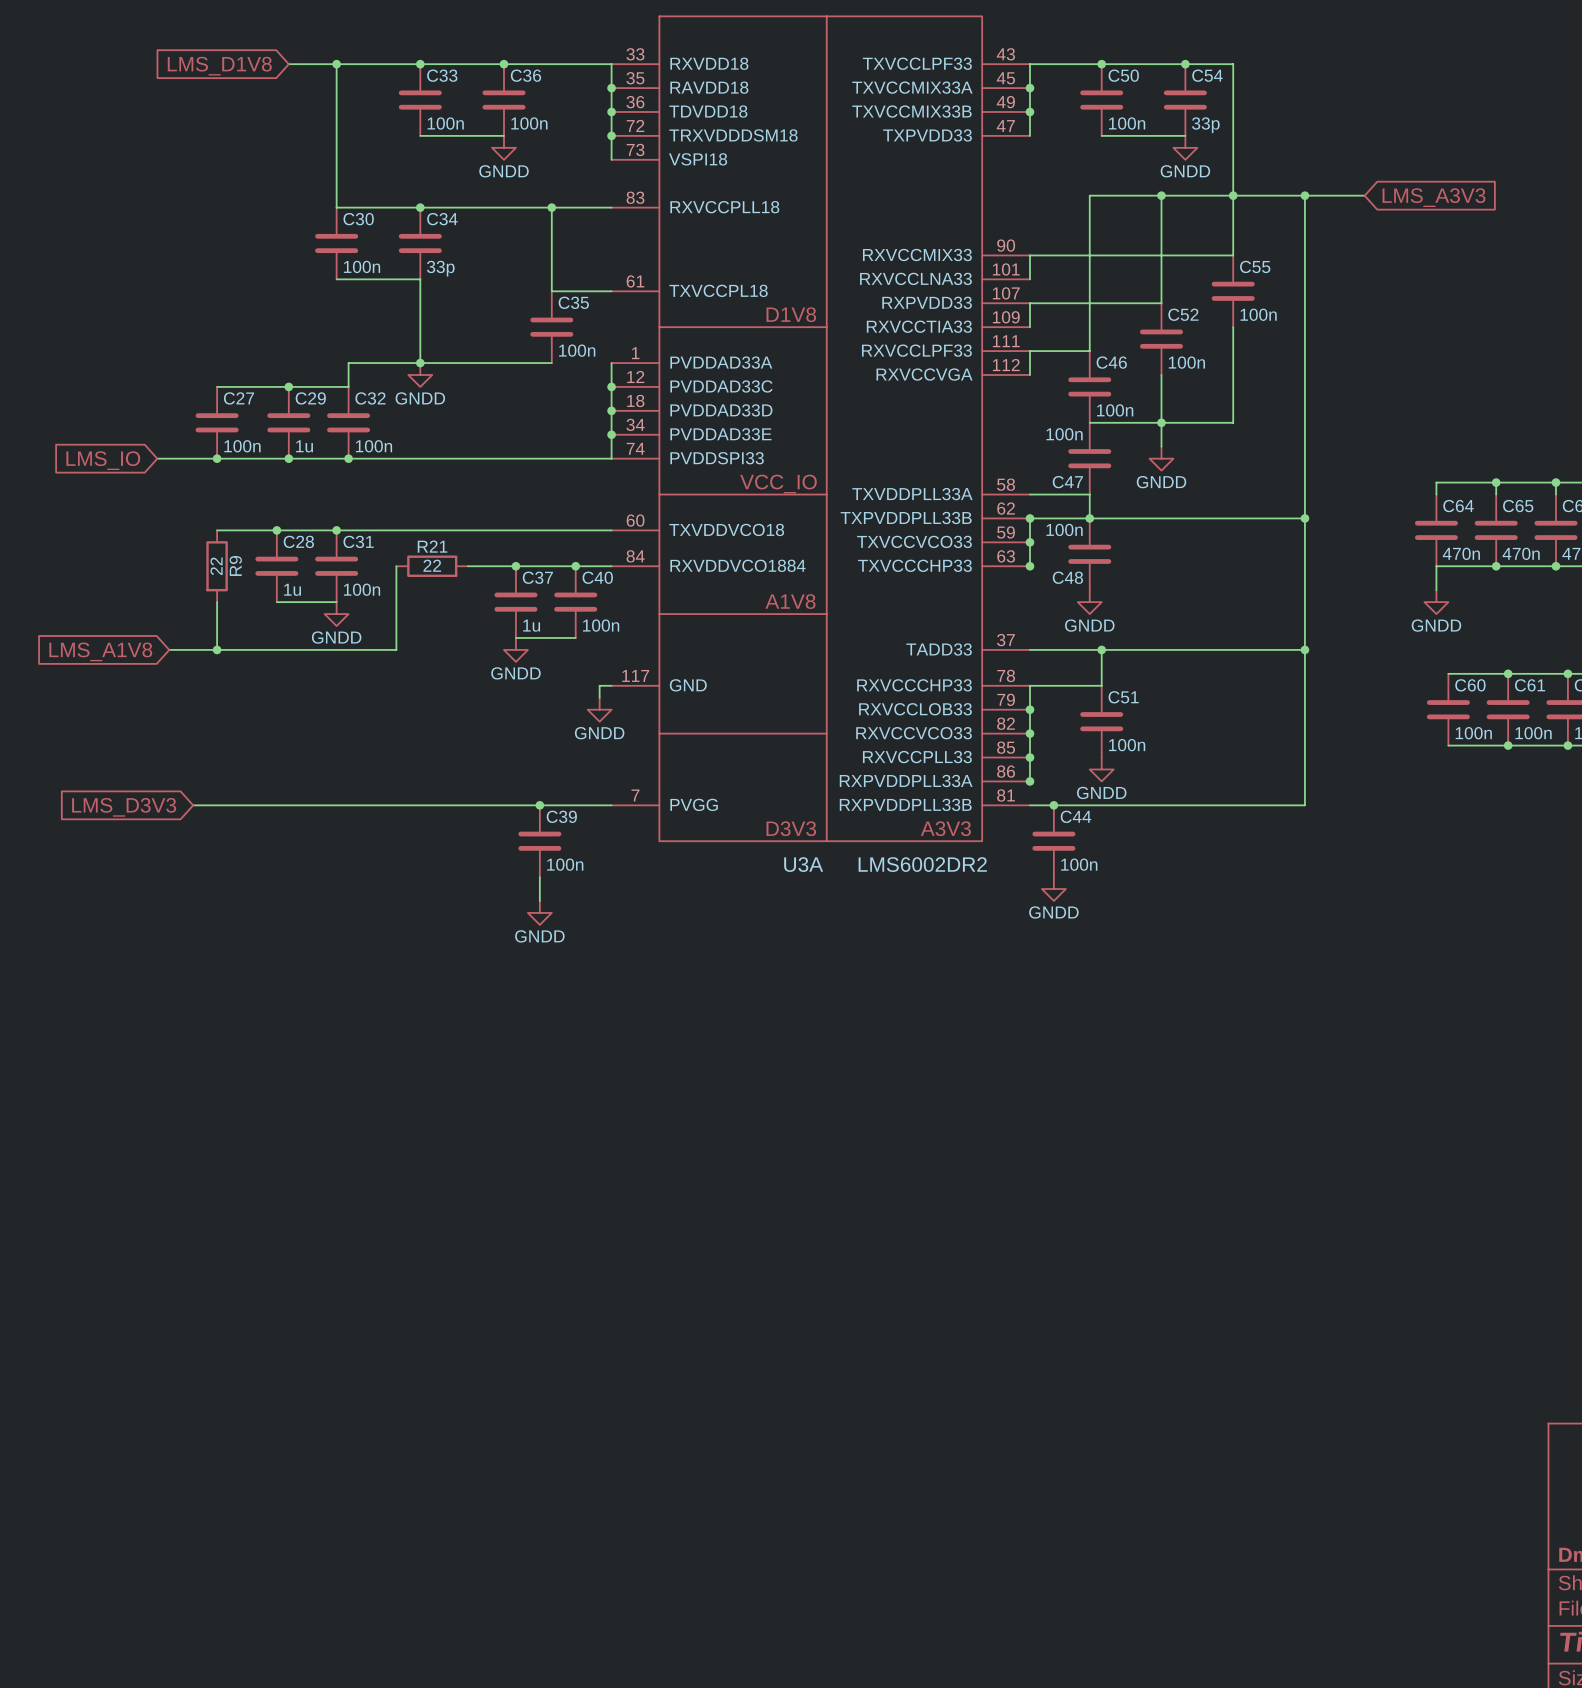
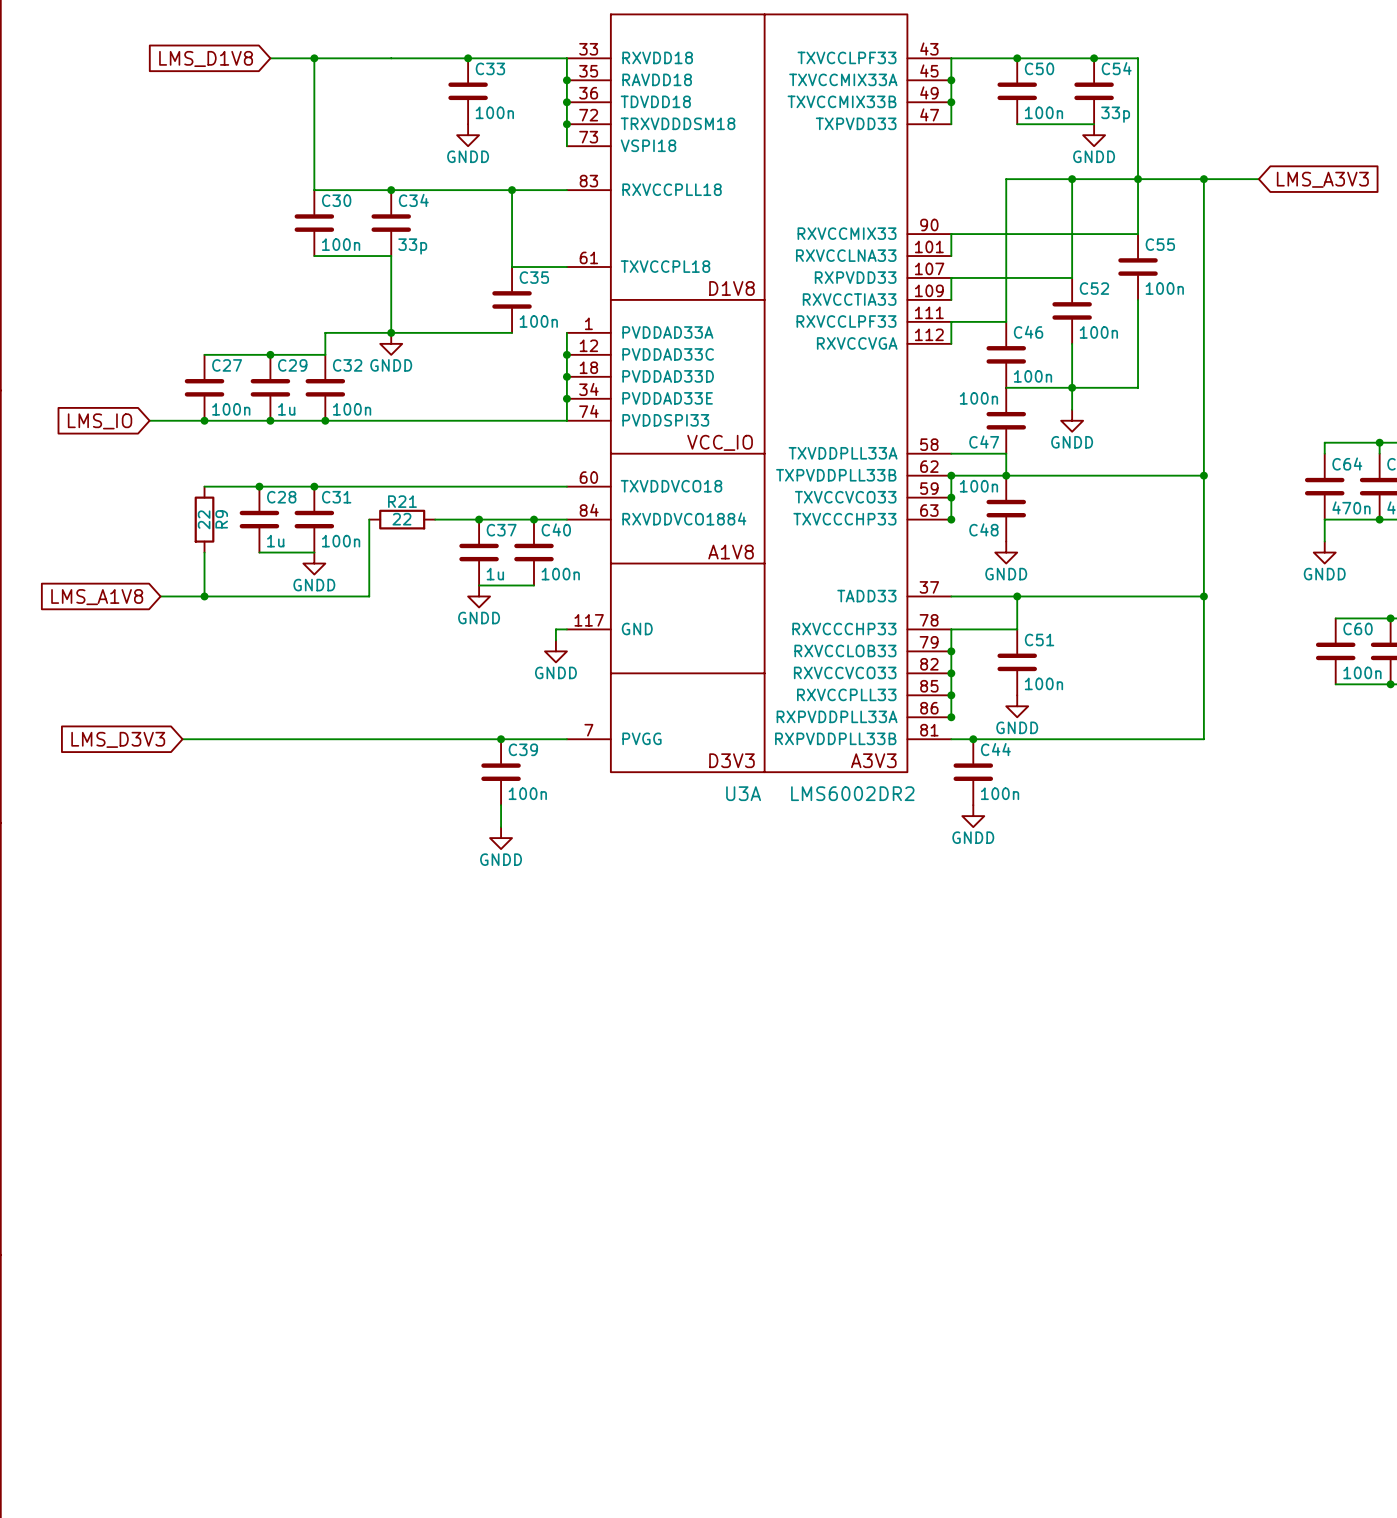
junction: (420, 64) -> none
C36 name: C36 (525, 75) -> C33 (490, 68)
C33: 100n (420, 100) -> none
wire: (420, 135) (503, 135) -> none

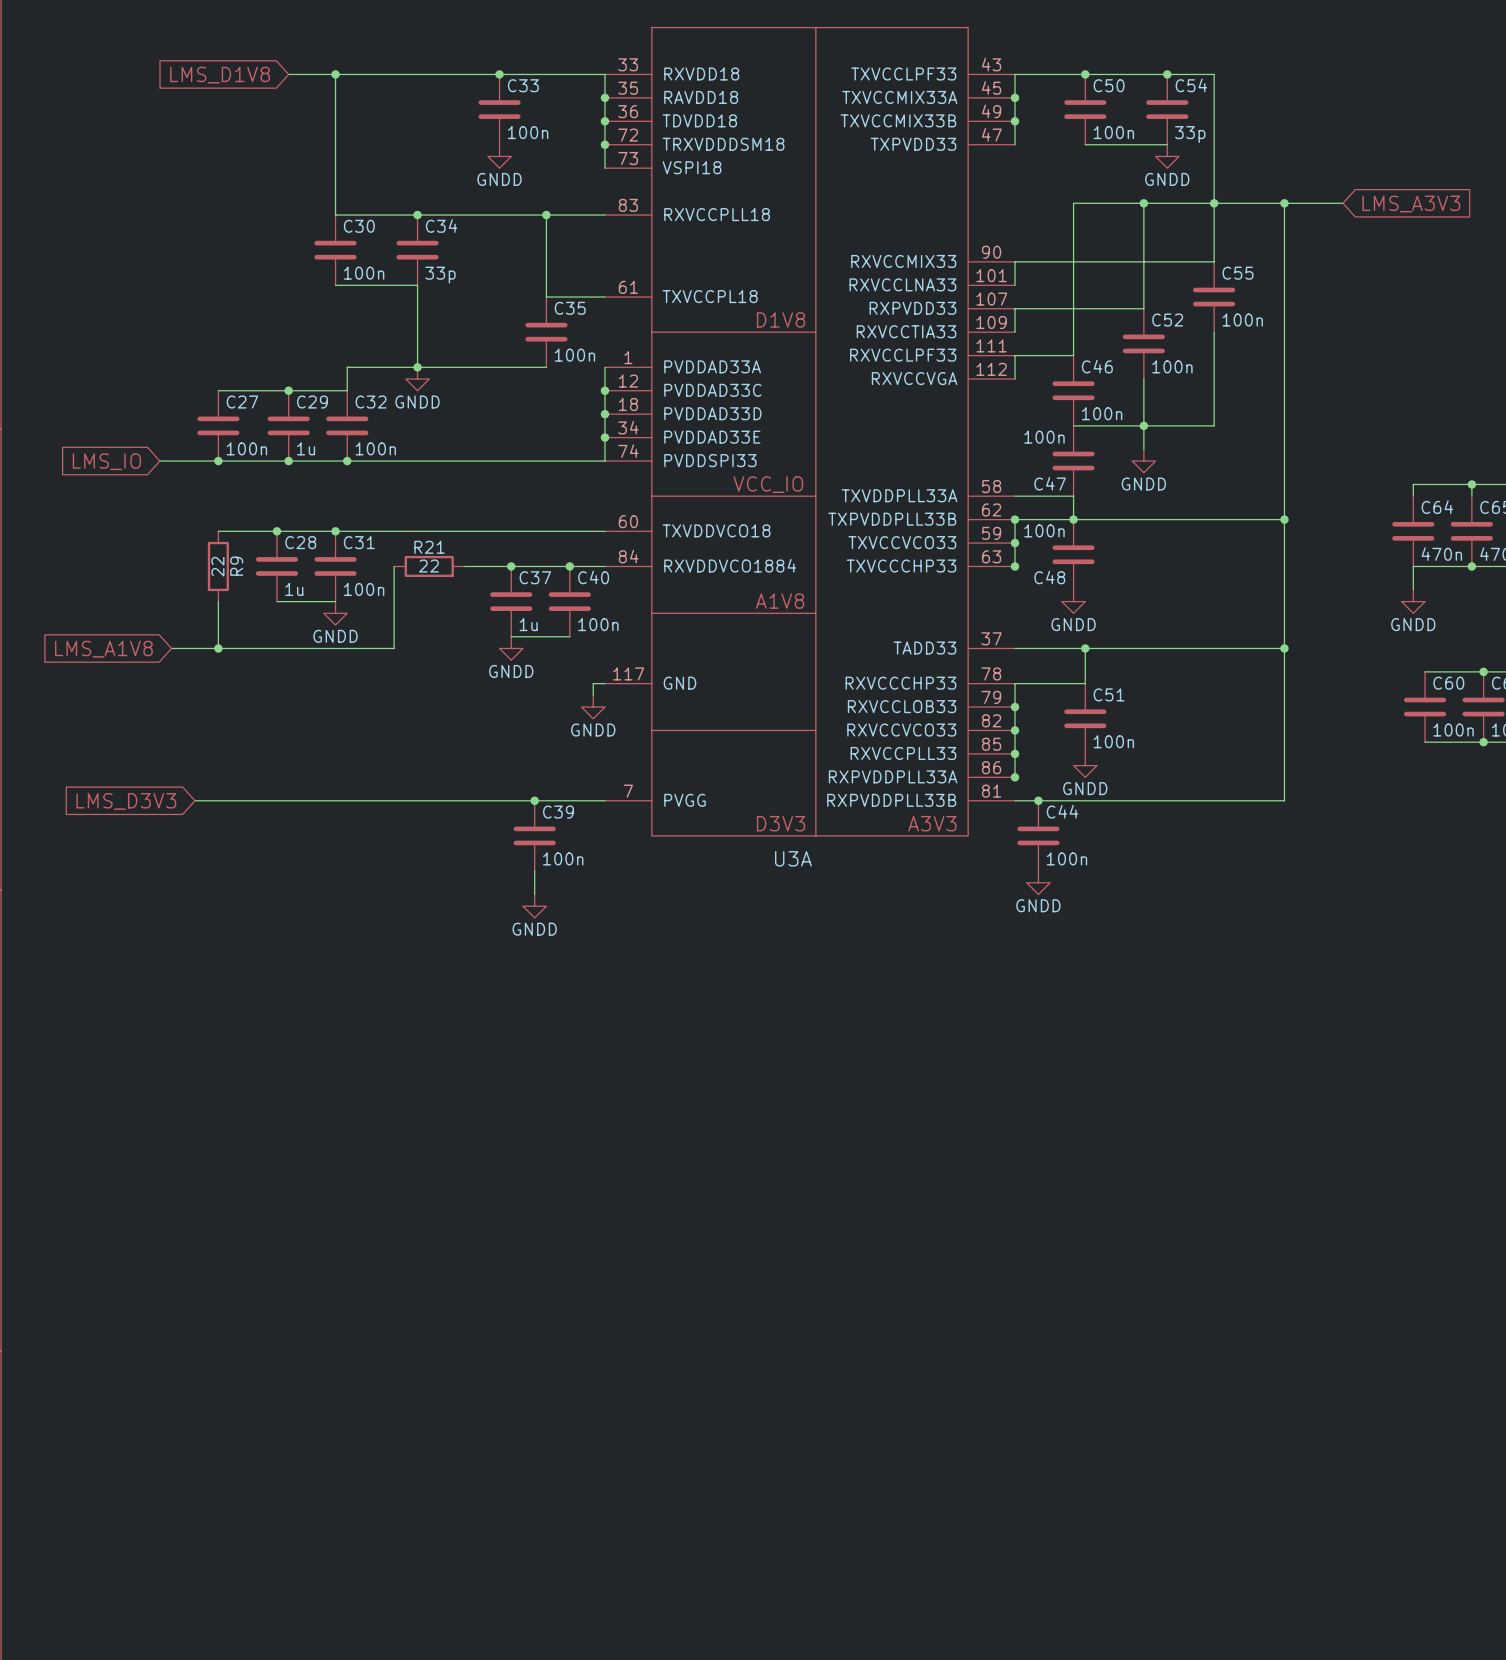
U3A text: LMS6002DR2 (852, 793) -> none

